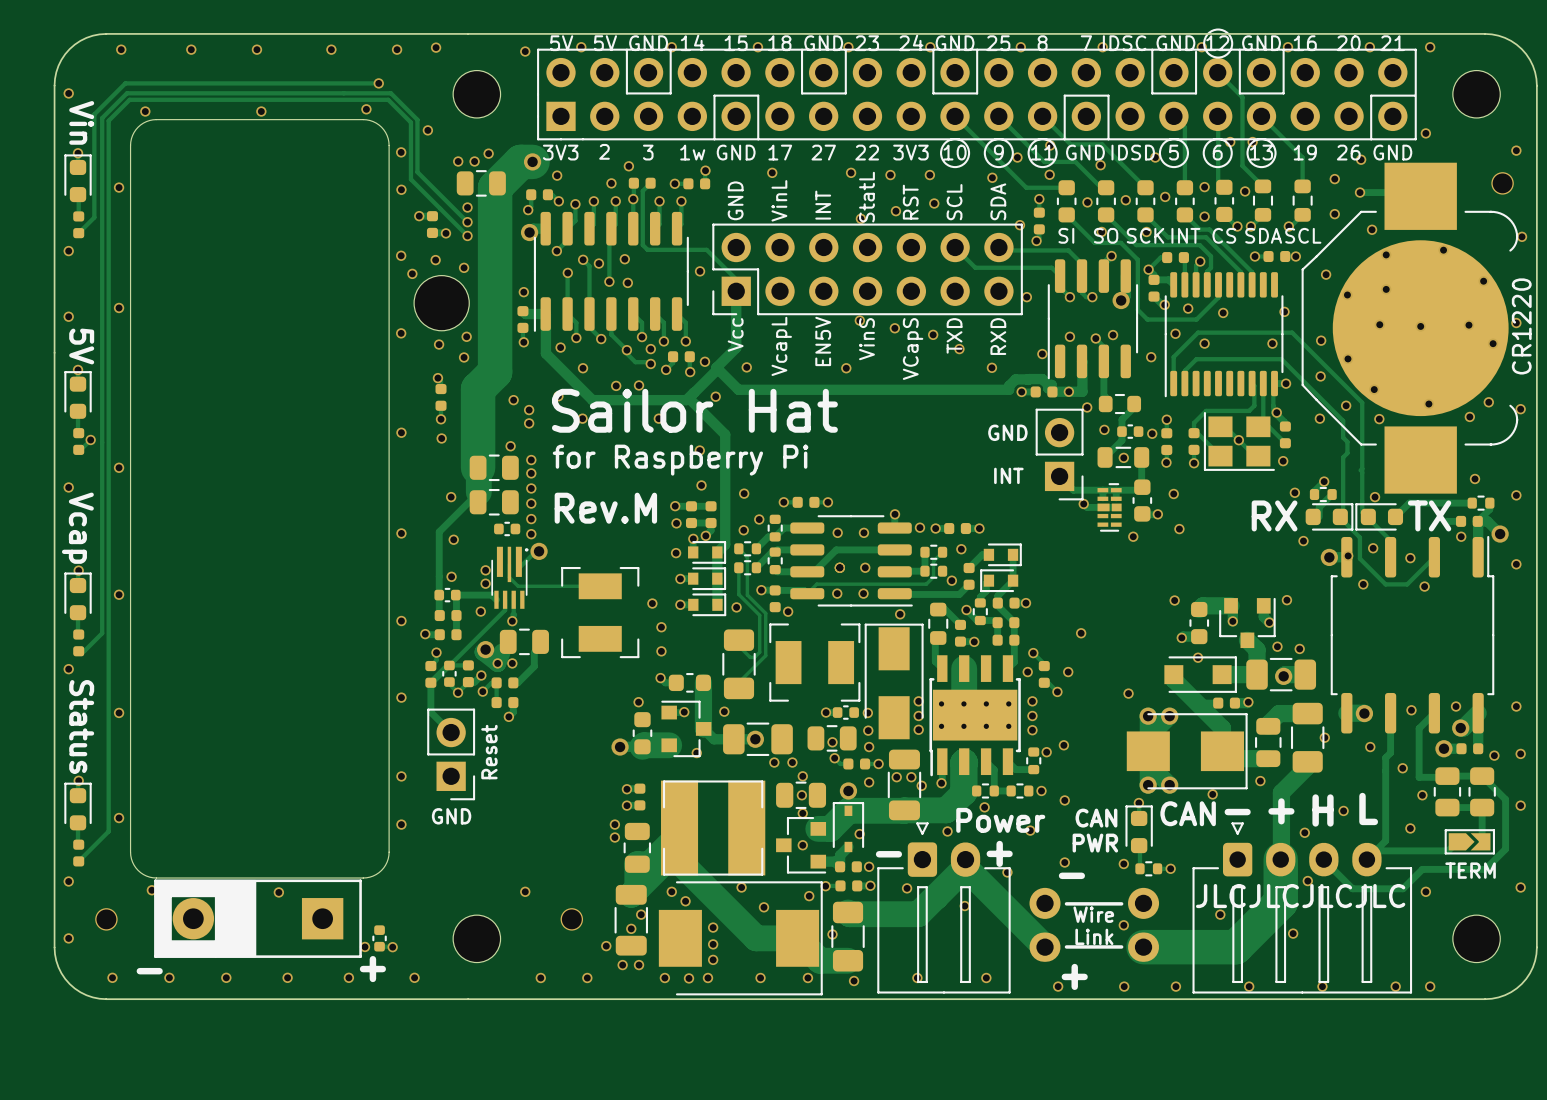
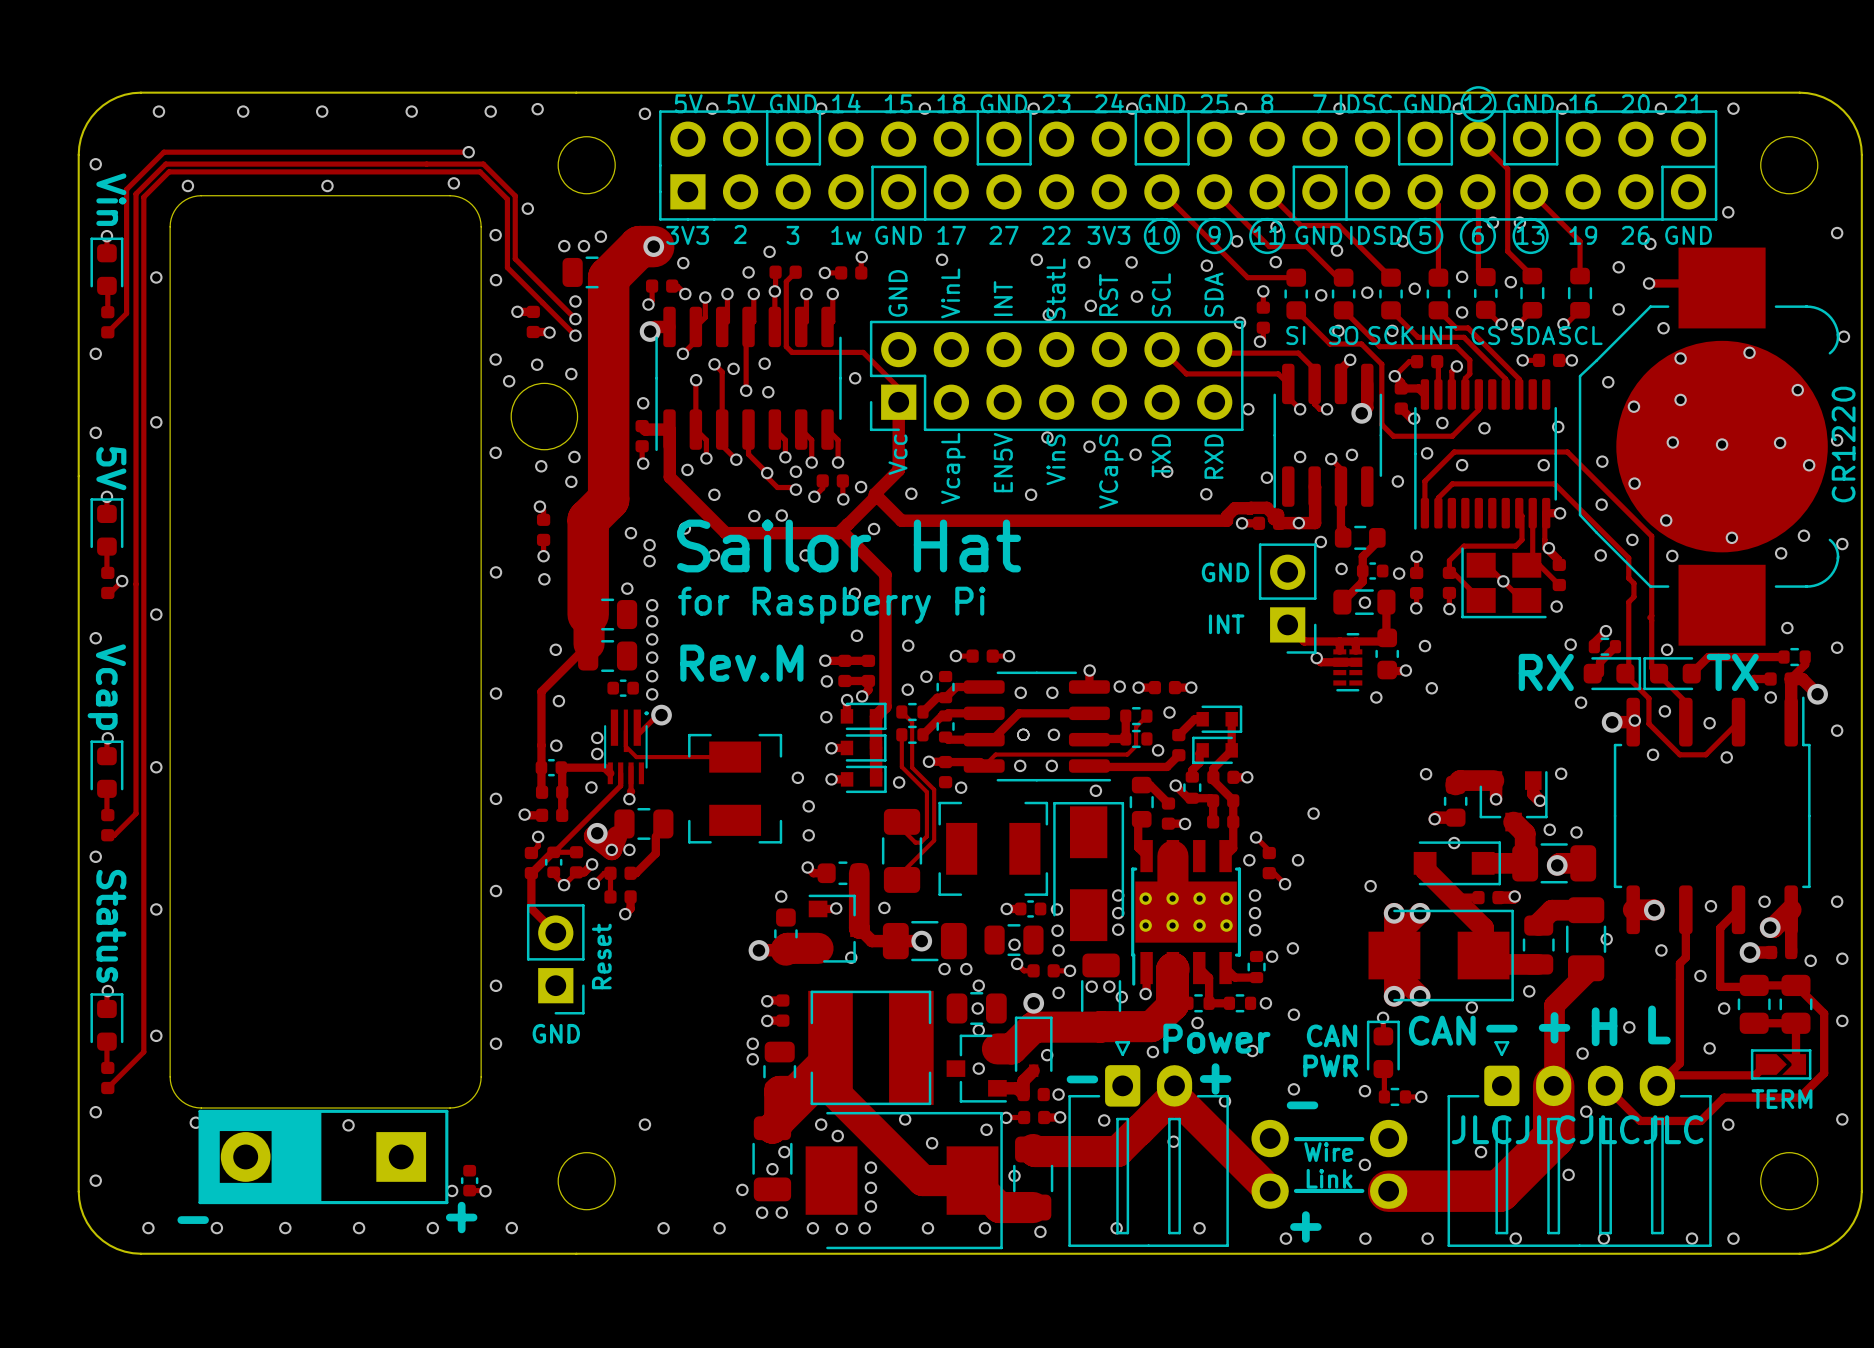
part: (1502, 183) -> none
part: (106, 919) -> none
part: (571, 919) -> none

